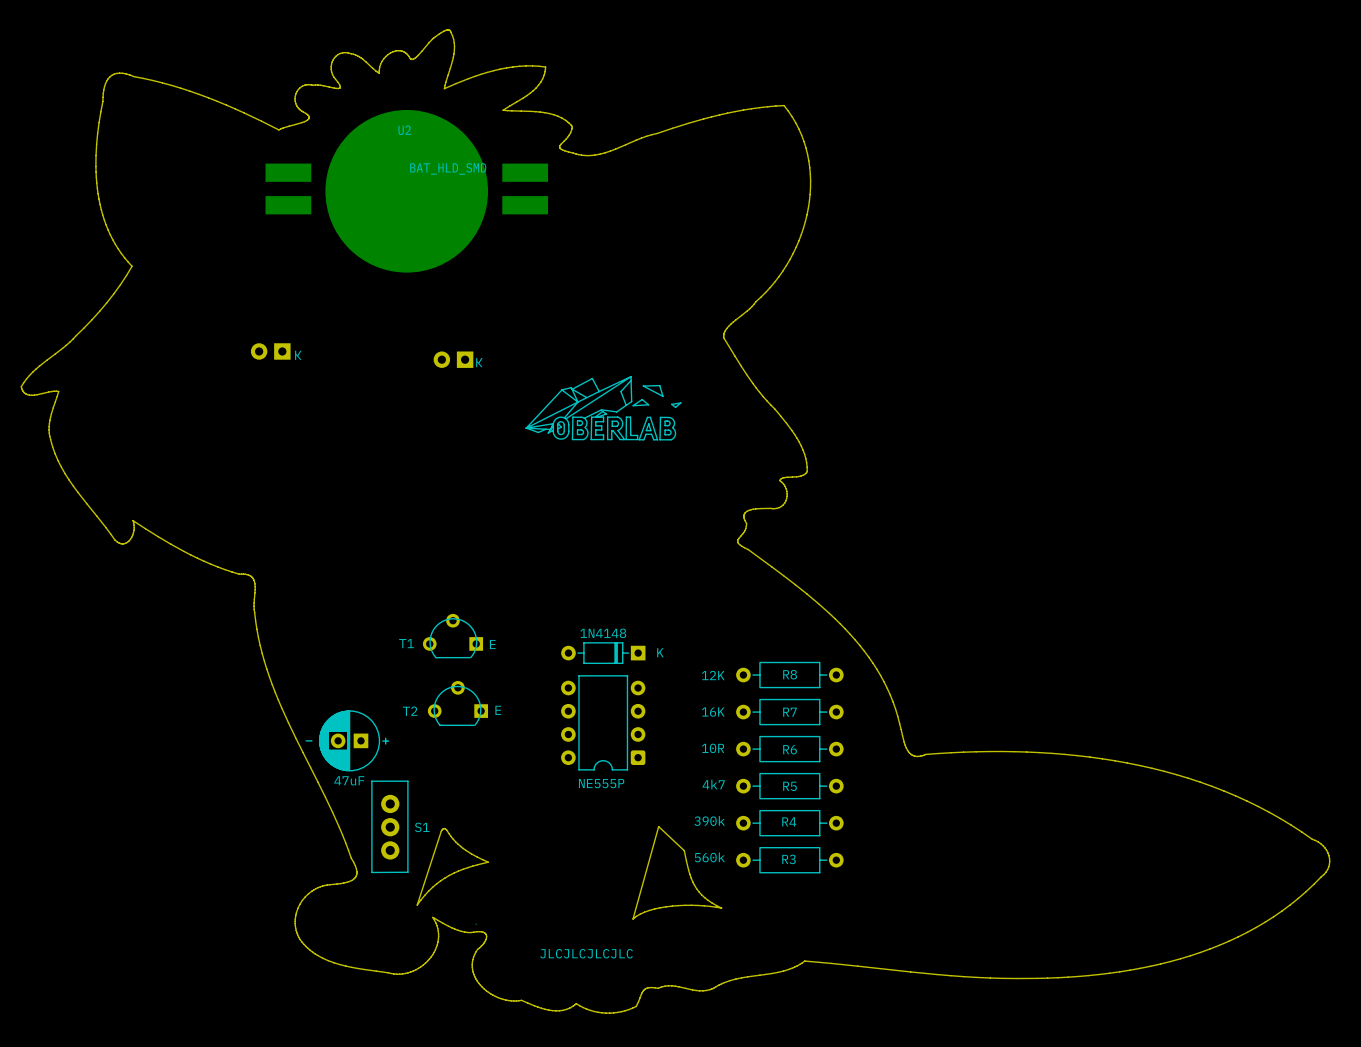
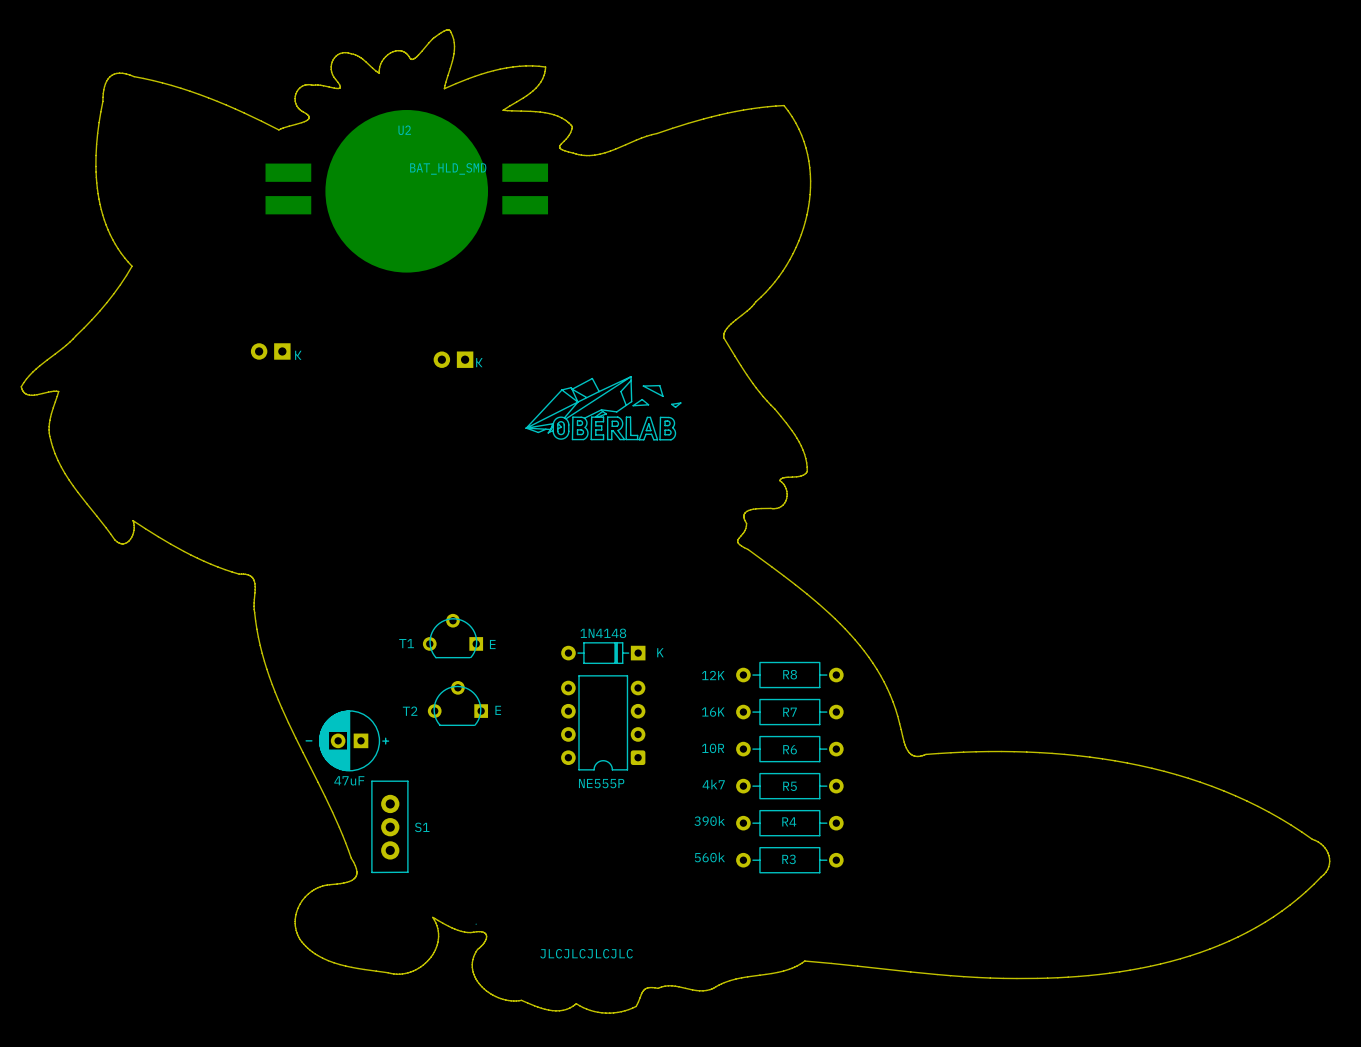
board edge: (658, 826) (633, 919) (644, 912) (666, 906) (691, 905) (721, 908) (708, 900) (698, 891) (691, 878) (684, 850) (658, 826) -> none
board edge: (444, 828) (463, 848) (488, 862) (463, 869) (445, 877) (428, 891) (417, 905) (441, 831) (444, 828) -> none

